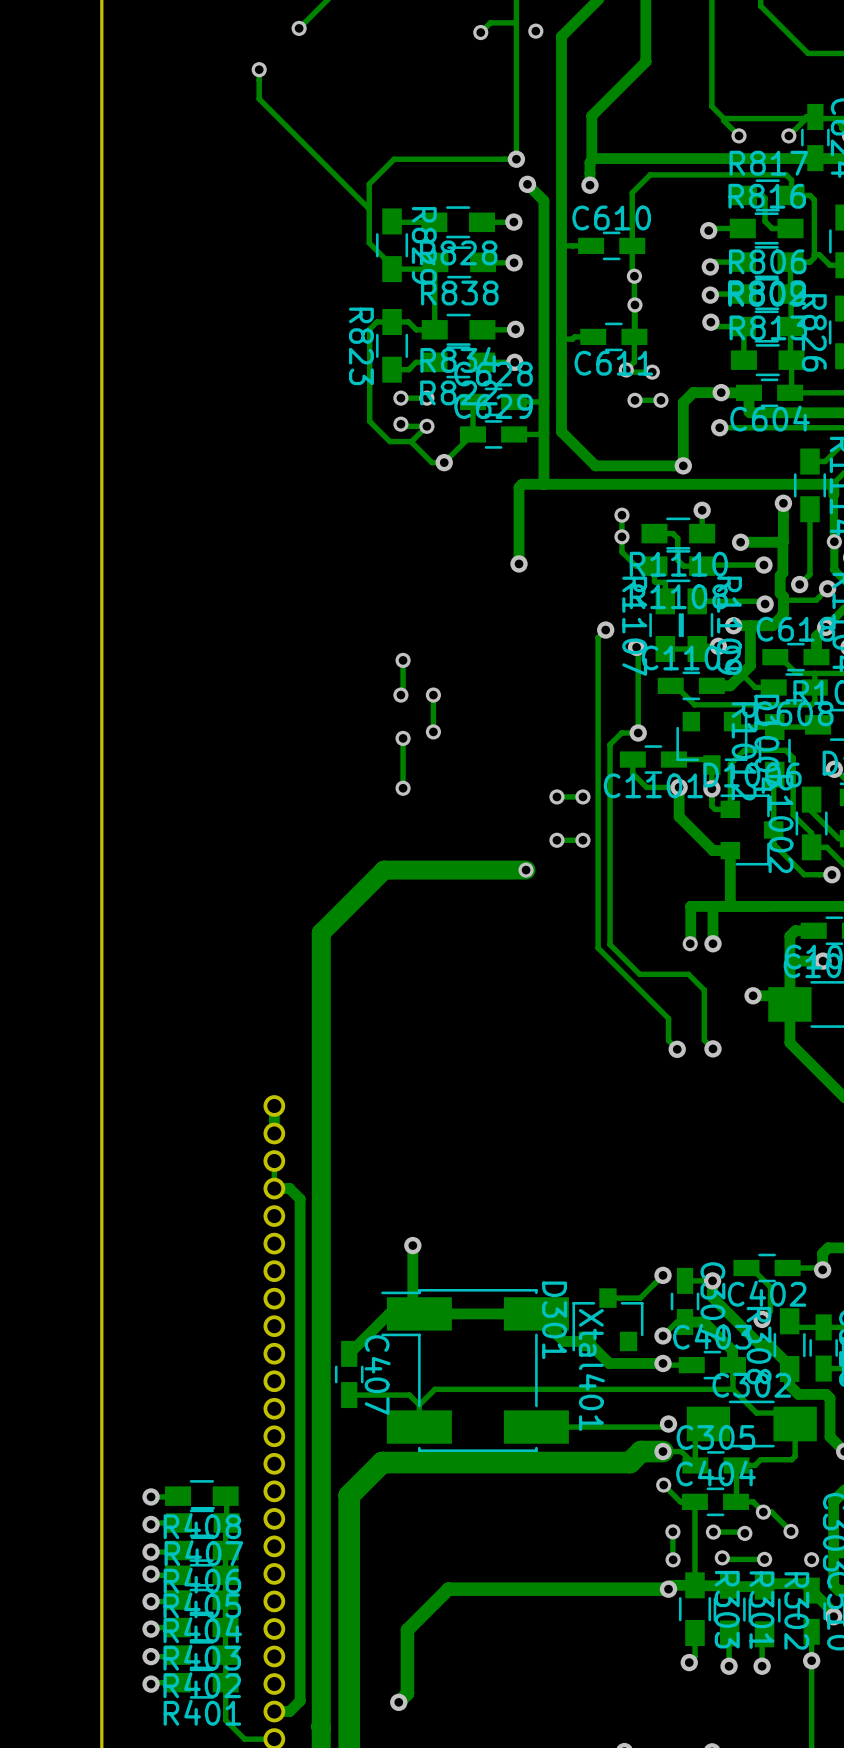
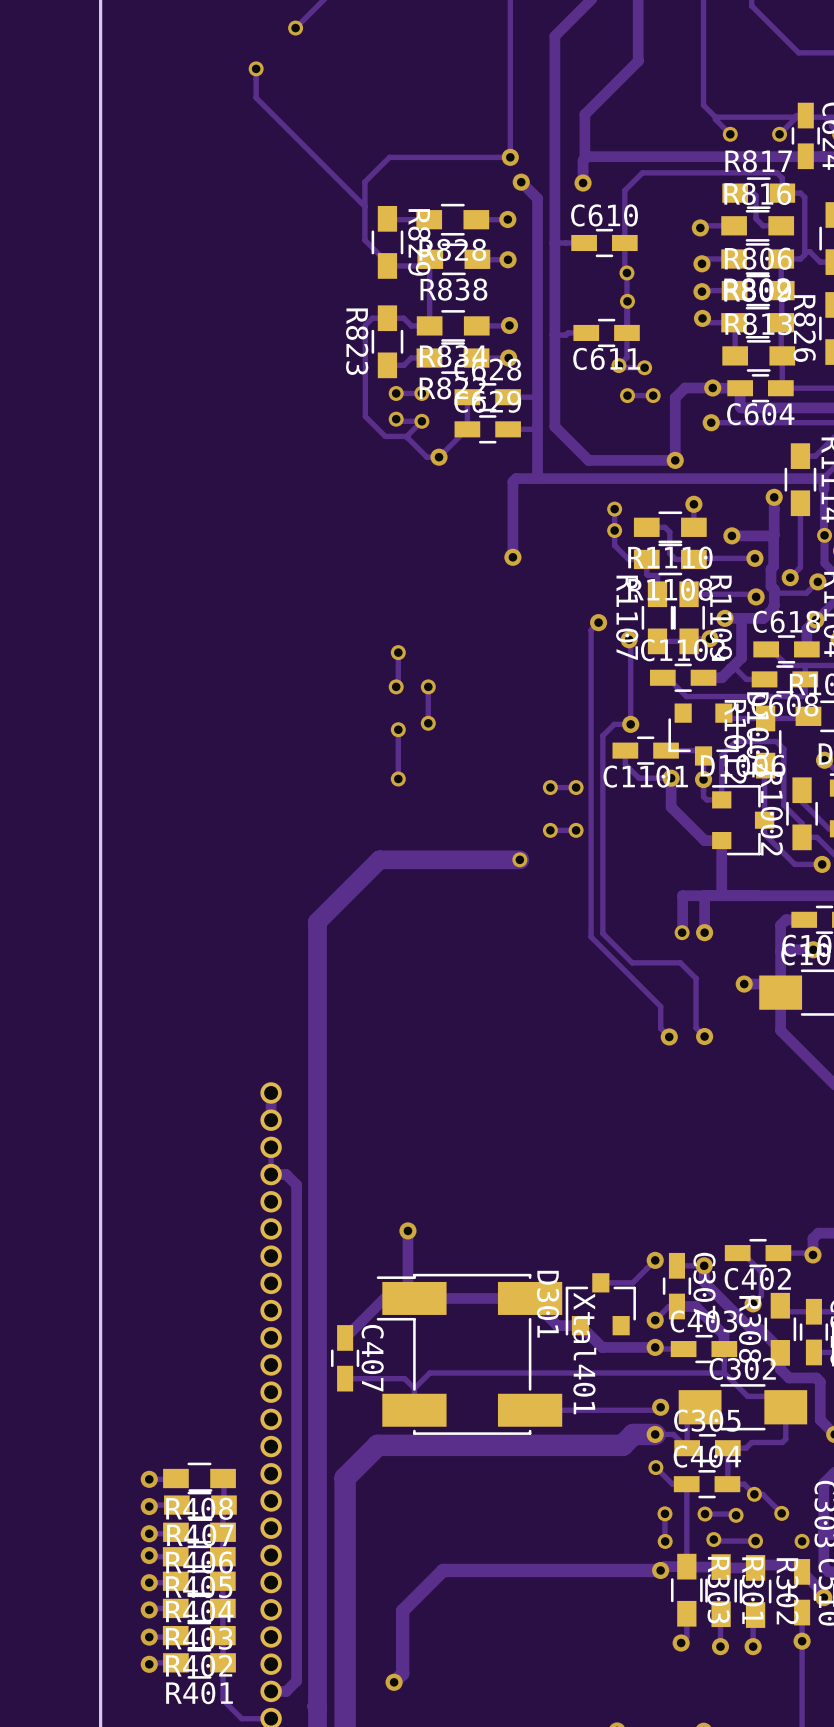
track: (516, 22) (490, 22) (480, 32) -> none
via: (535, 31) -> none
via: (480, 32) -> none

